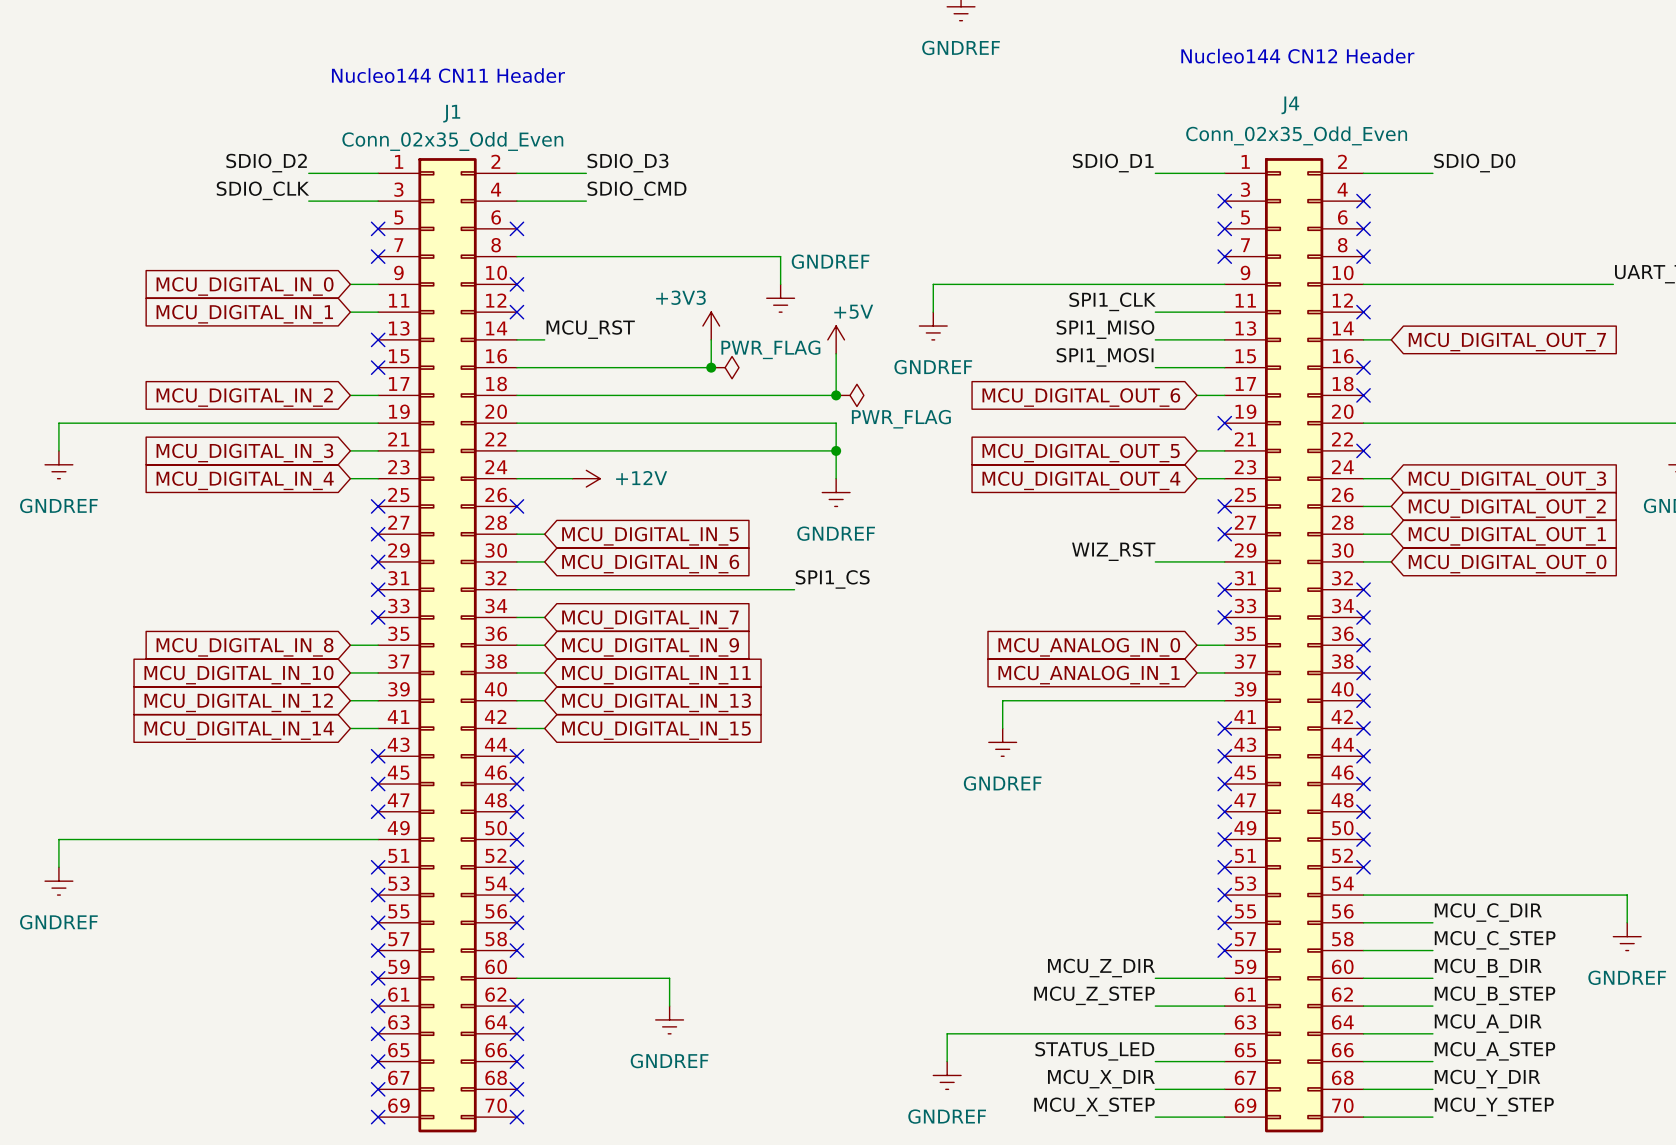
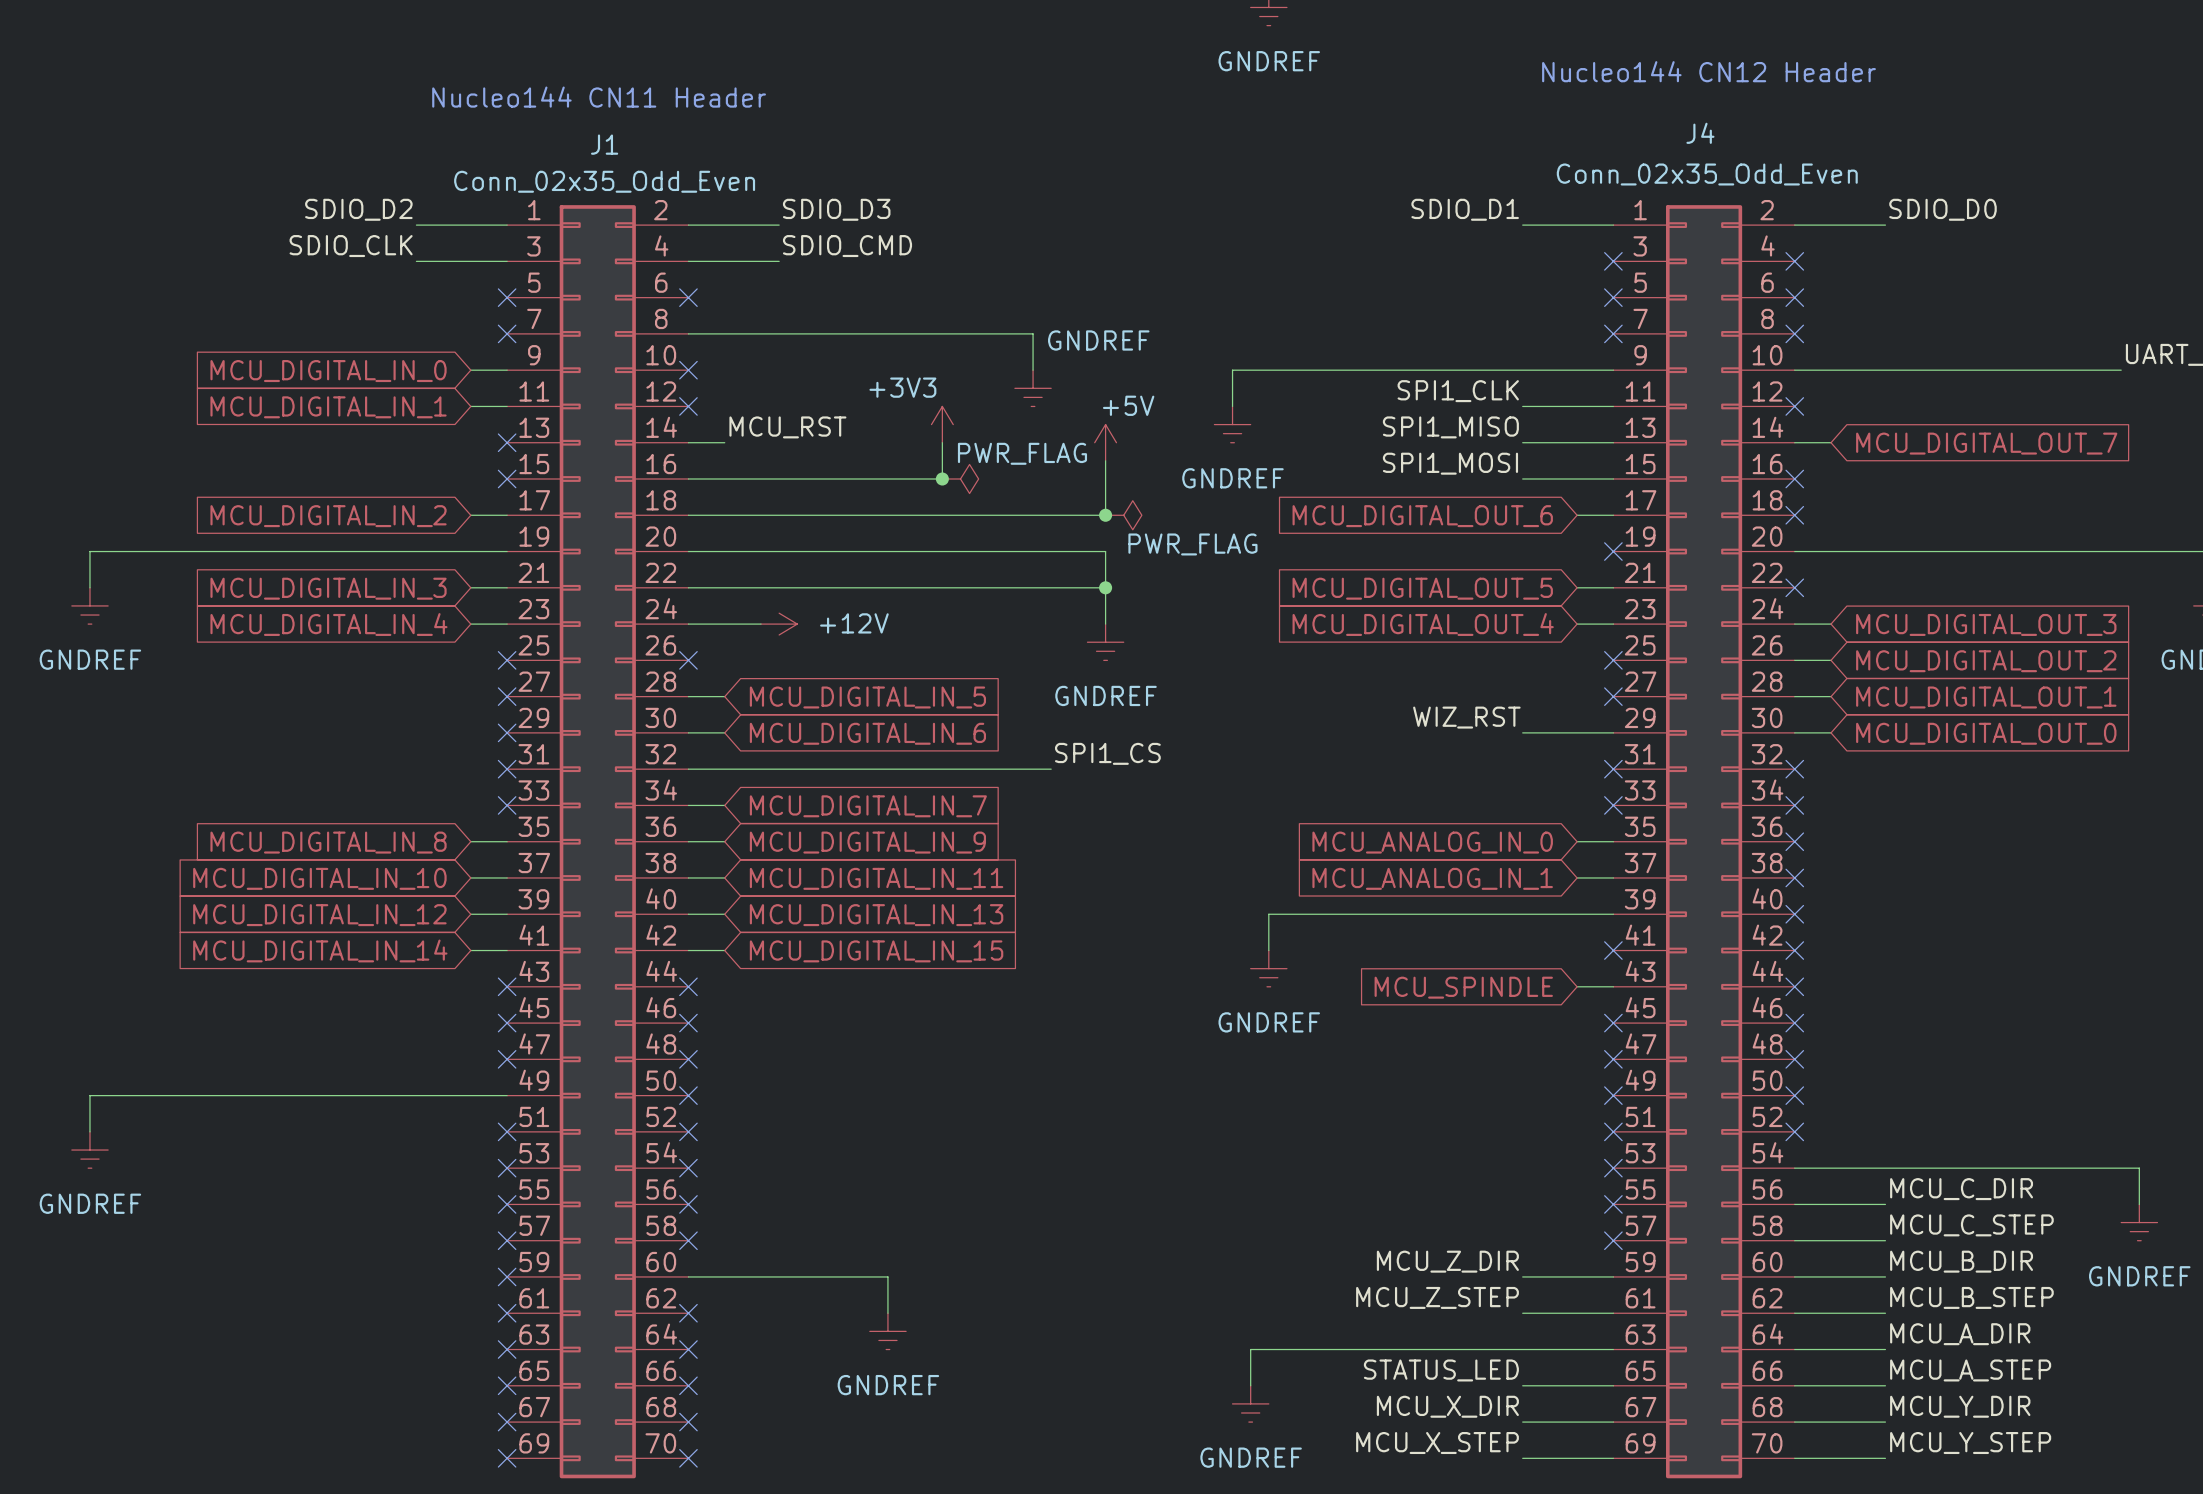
wire: (1002, 700) (1002, 728) -> (1323, 914) (1268, 914) (1268, 950)
power symbol position: GNDREF (1002, 742) -> GNDREF (1268, 968)
wire: none -> (1577, 986) (1613, 986)
no-connect mark: (1224, 756) -> none
global label: none -> MCU_SPINDLE (1463, 987)

